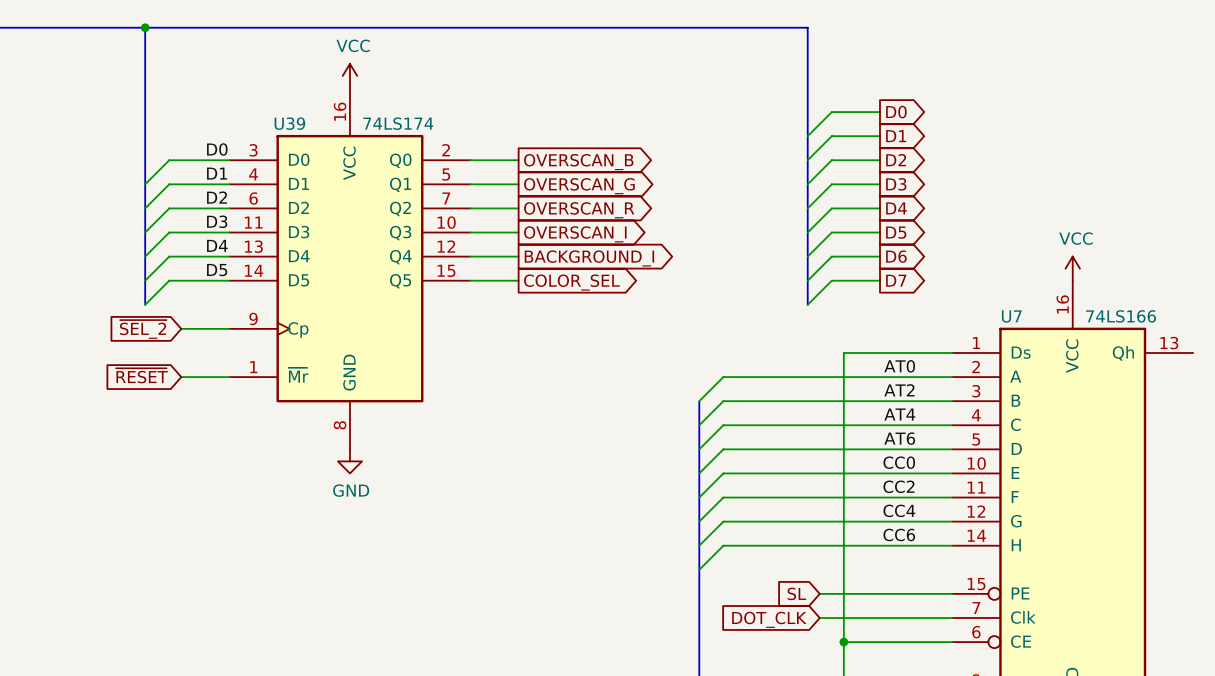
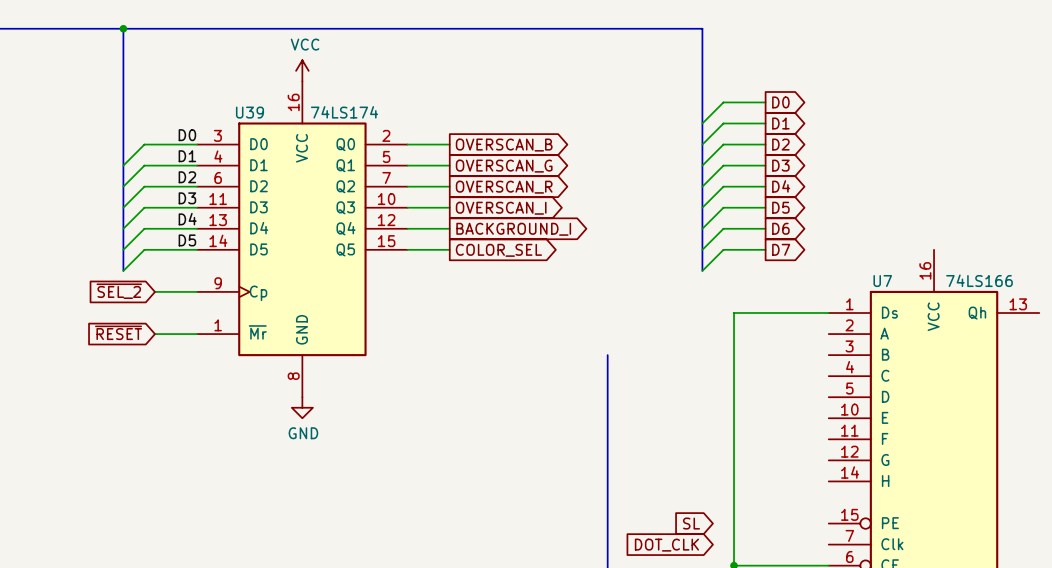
power symbol: VCC (1072, 268) -> none
label: AT0 (899, 366) -> none
wire: (952, 377) (723, 377) (699, 401) -> none
label: AT2 (899, 390) -> none
wire: (952, 401) (723, 401) (699, 425) -> none
label: AT4 (899, 414) -> none
wire: (952, 425) (723, 425) (699, 449) -> none
label: AT6 (899, 438) -> none
wire: (952, 449) (723, 449) (699, 473) -> none
label: CC0 (899, 462) -> none
wire: (952, 473) (723, 473) (699, 497) -> none
label: CC2 (898, 486) -> none
wire: (952, 497) (723, 497) (699, 521) -> none
label: CC4 (899, 510) -> none
wire: (952, 521) (723, 521) (699, 545) -> none
label: CC6 (899, 534) -> none
wire: (952, 545) (723, 545) (699, 569) -> none
wire: (819, 593) (952, 593) -> none
wire: (819, 617) (952, 617) -> none

